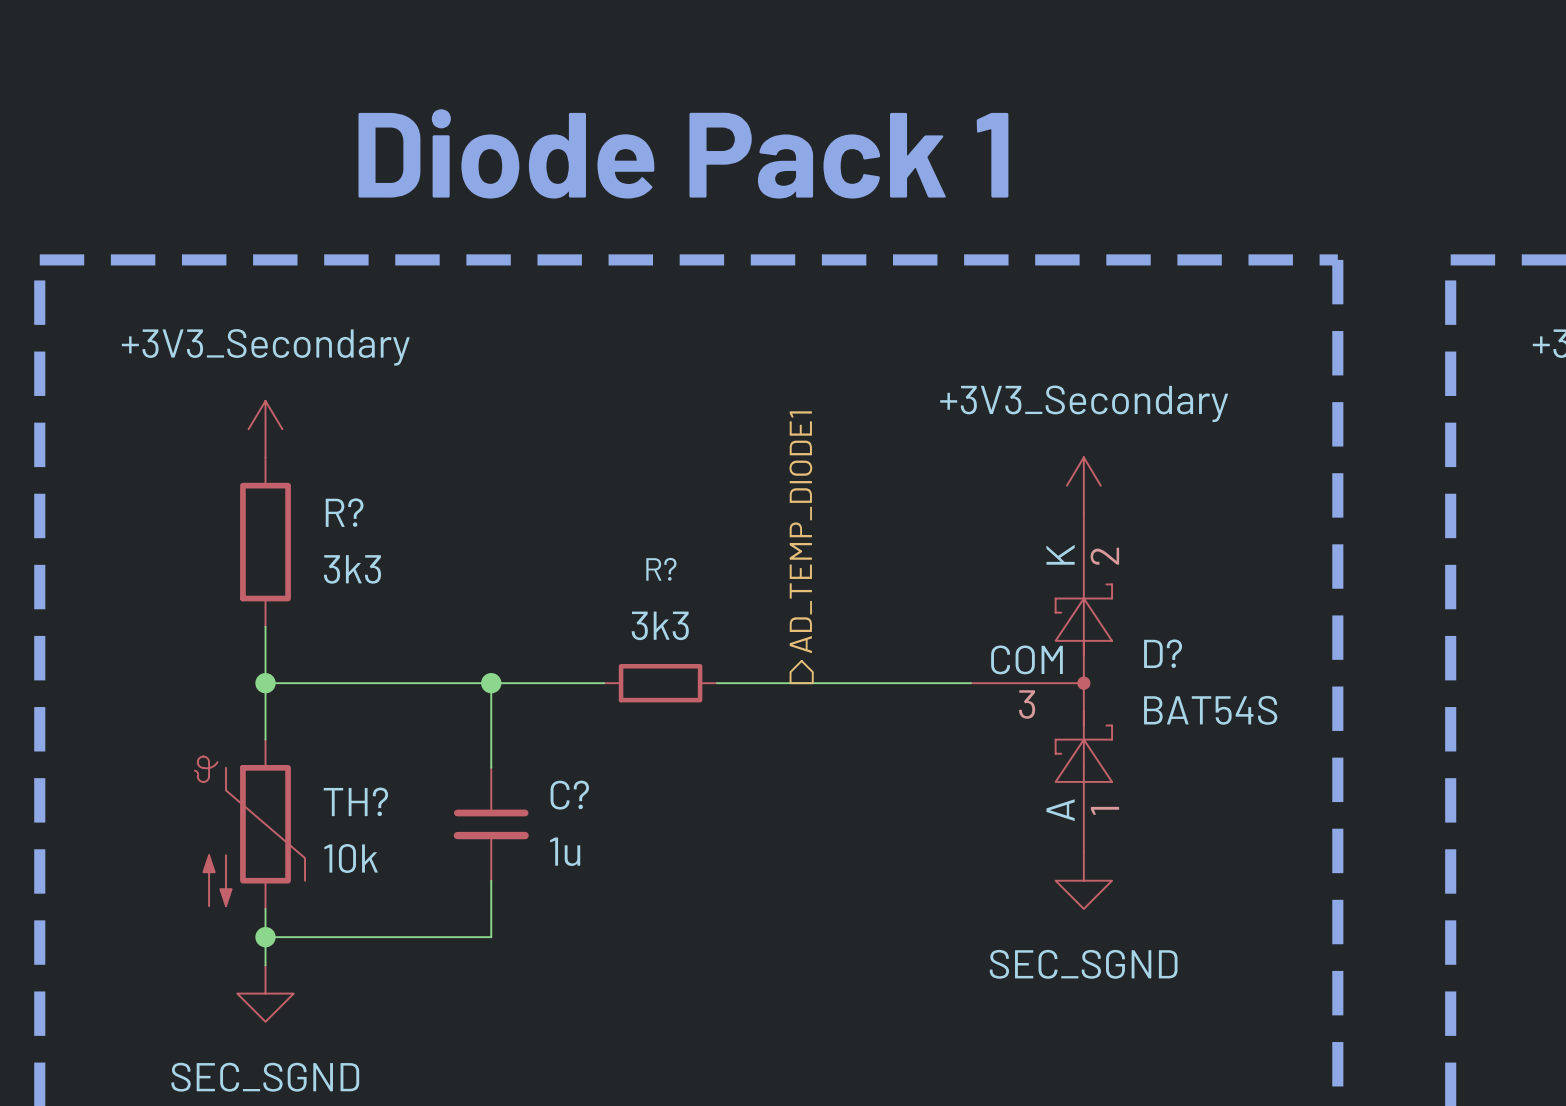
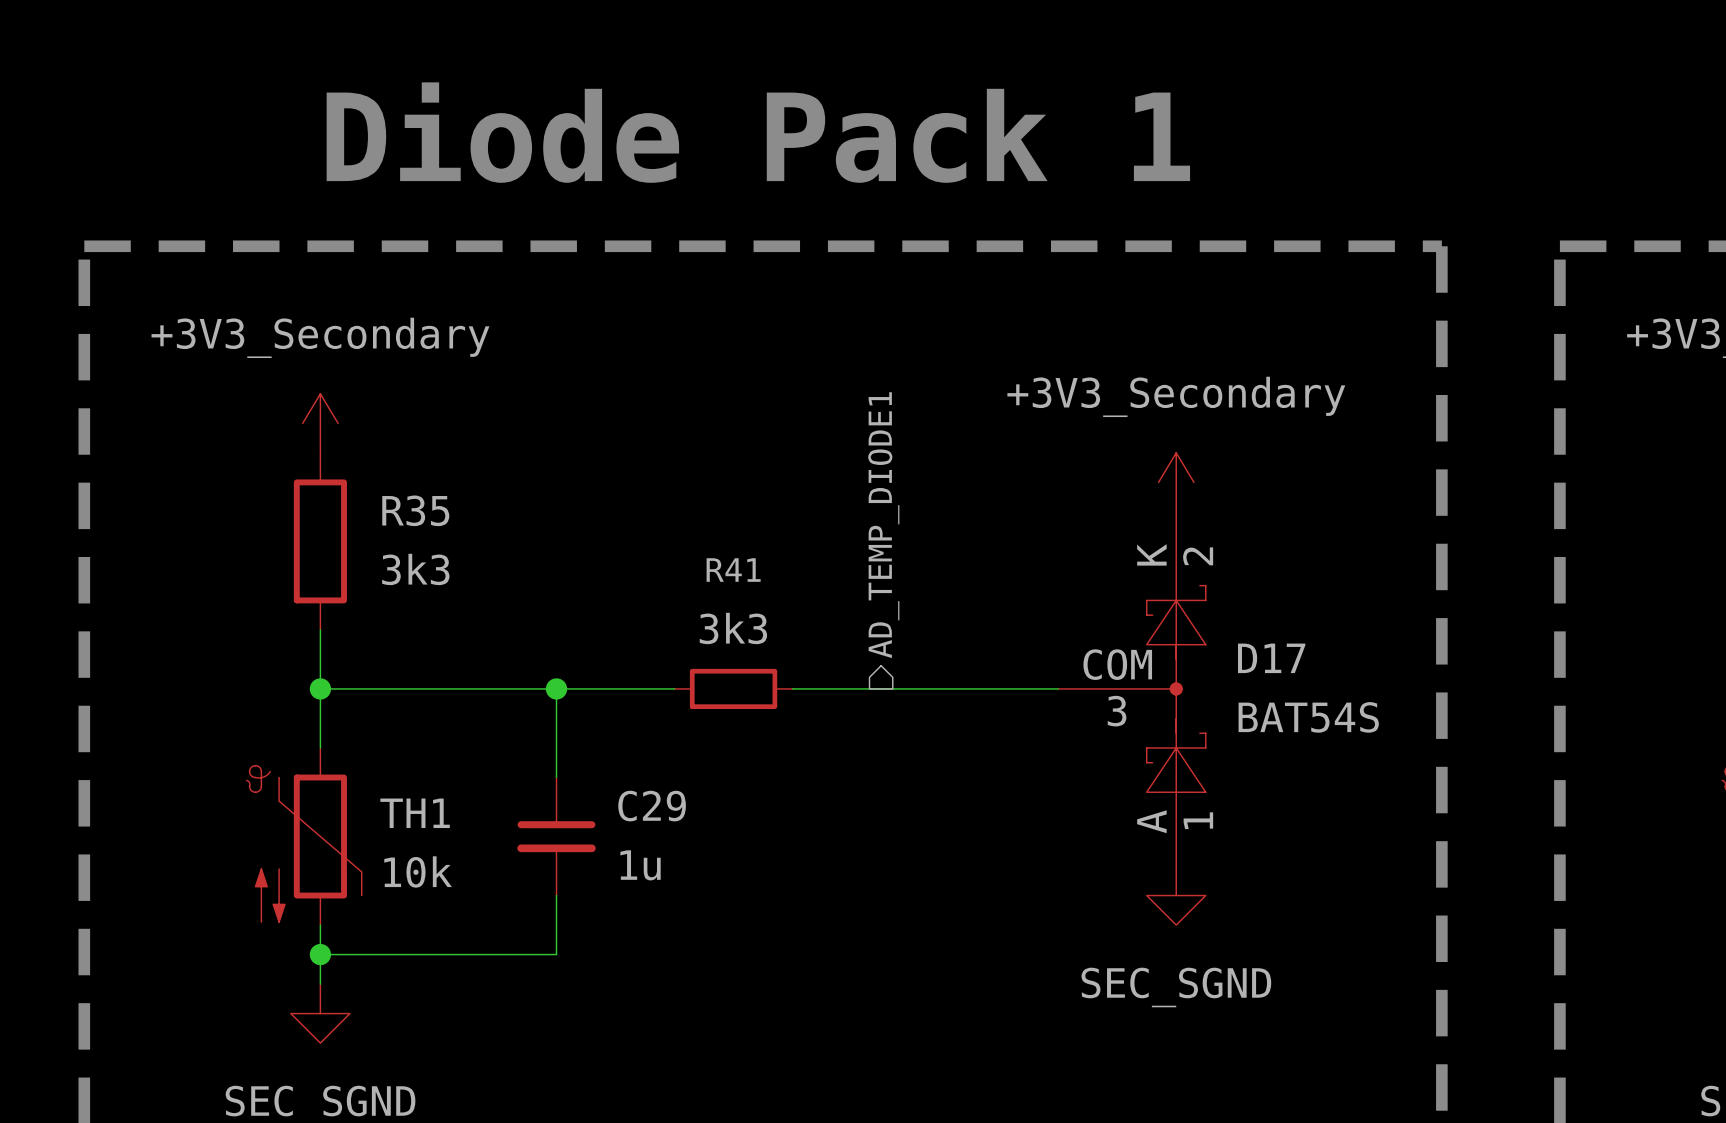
R? name: R? (344, 512) -> R35 (415, 510)
R? name: R? (661, 569) -> R41 (733, 570)
D? name: D? (1163, 653) -> D17 (1271, 658)
C? name: C? (569, 795) -> C29 (652, 806)
TH? name: TH? (355, 801) -> TH1 (415, 813)

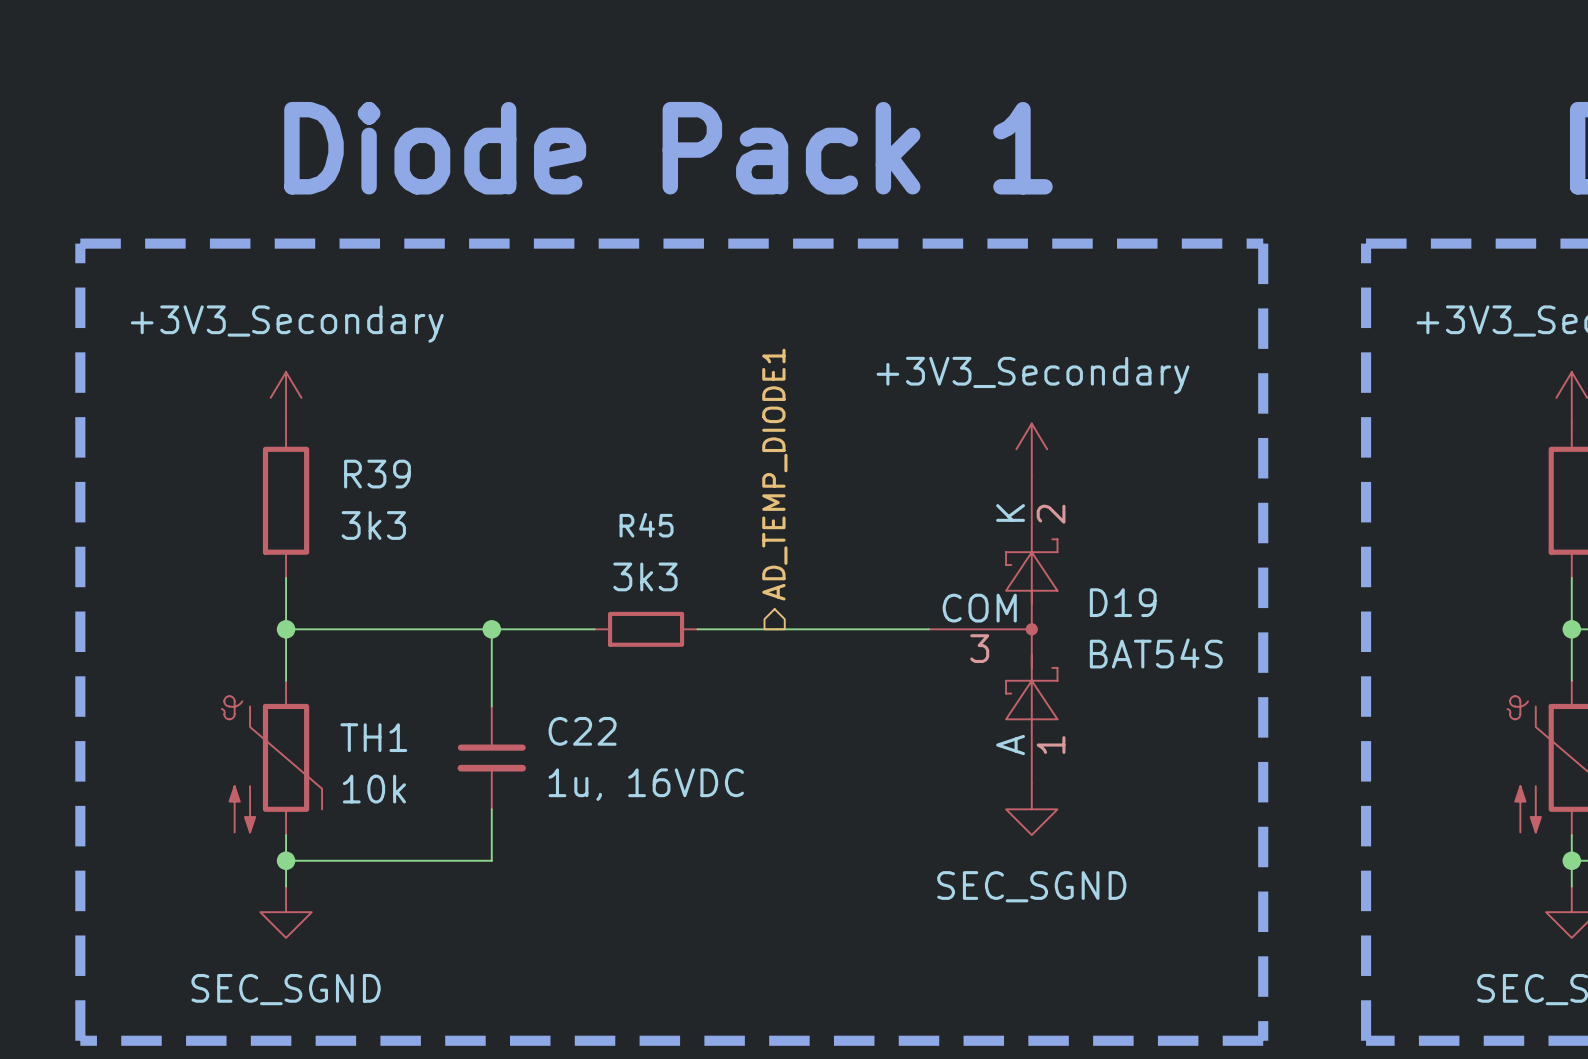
R35 name: R35 (415, 510) -> R39 (377, 474)
R41 name: R41 (733, 570) -> R45 (646, 525)
D17 name: D17 (1271, 658) -> D19 (1123, 602)
C29 name: C29 (652, 806) -> C22 (582, 731)
C29 value: 1u (640, 865) -> 1u, 16VDC (646, 784)

